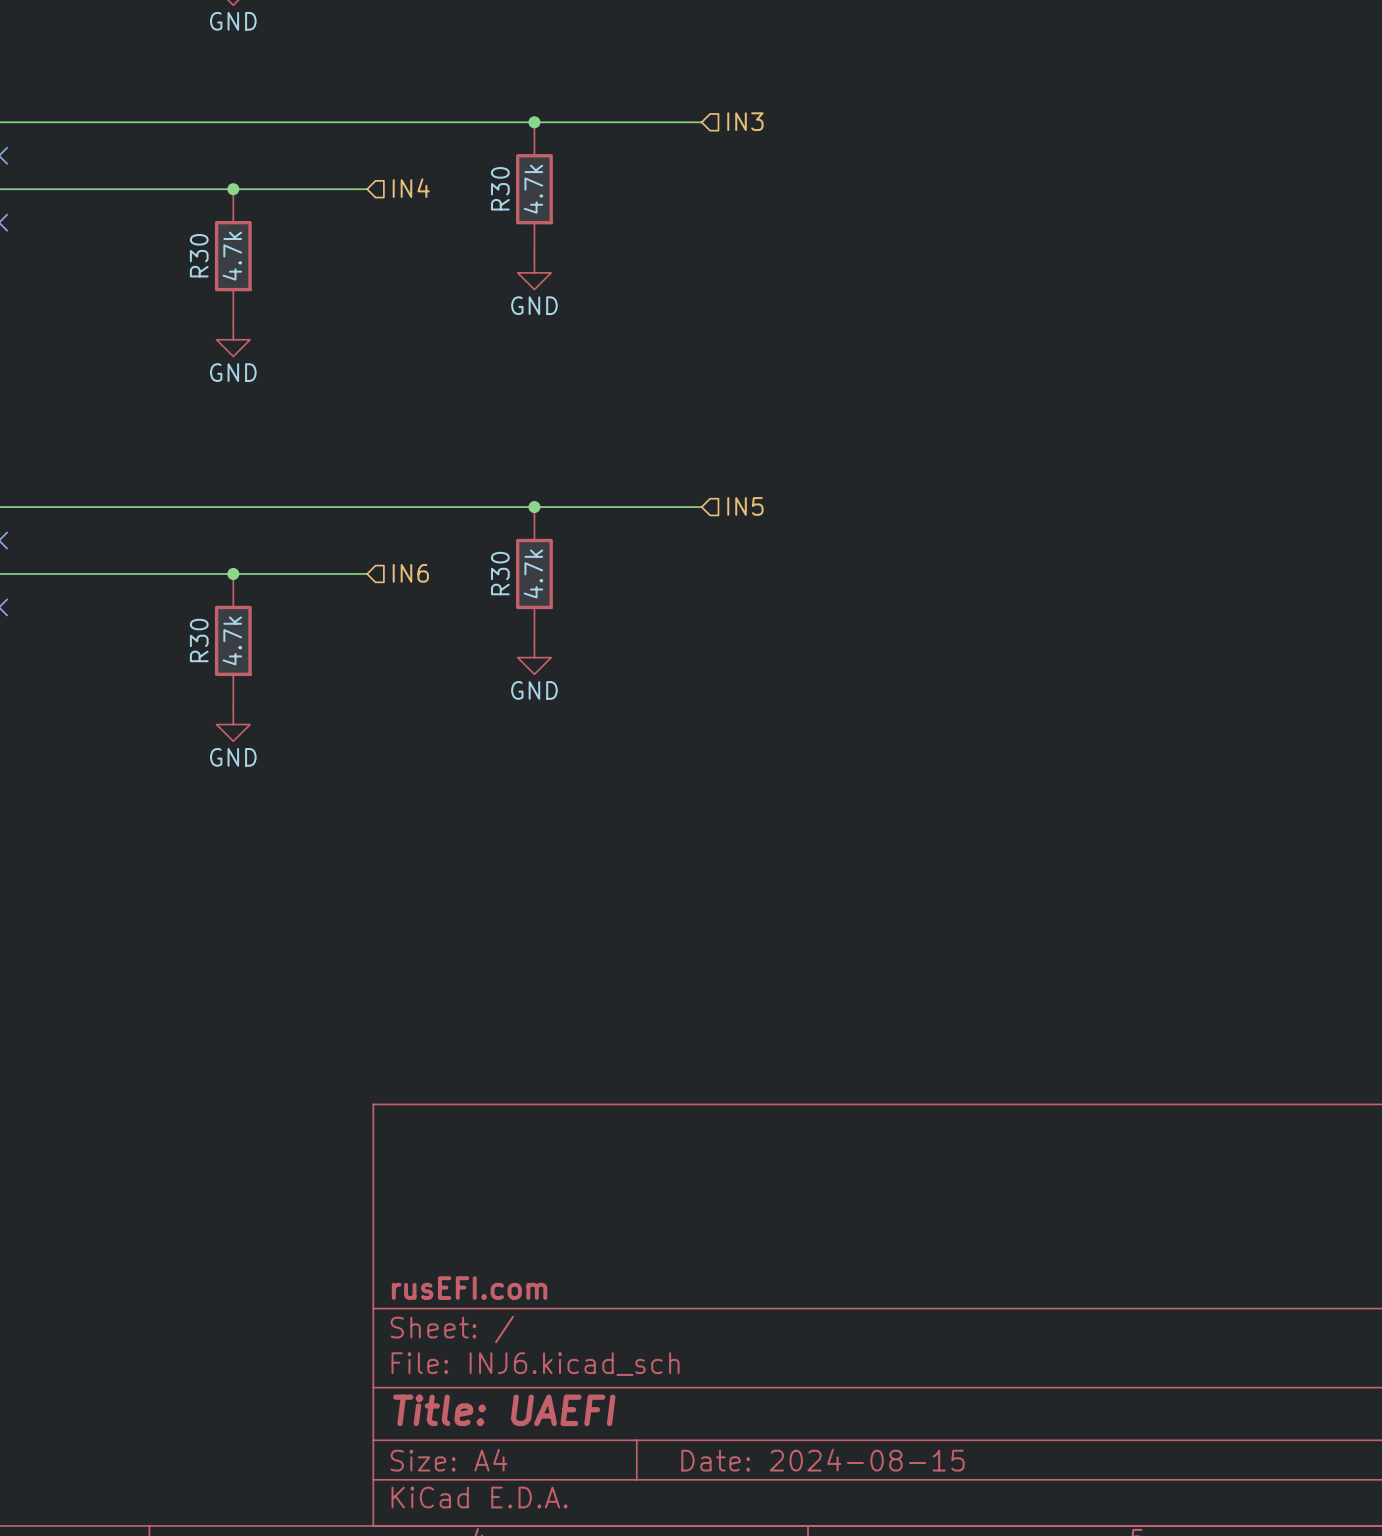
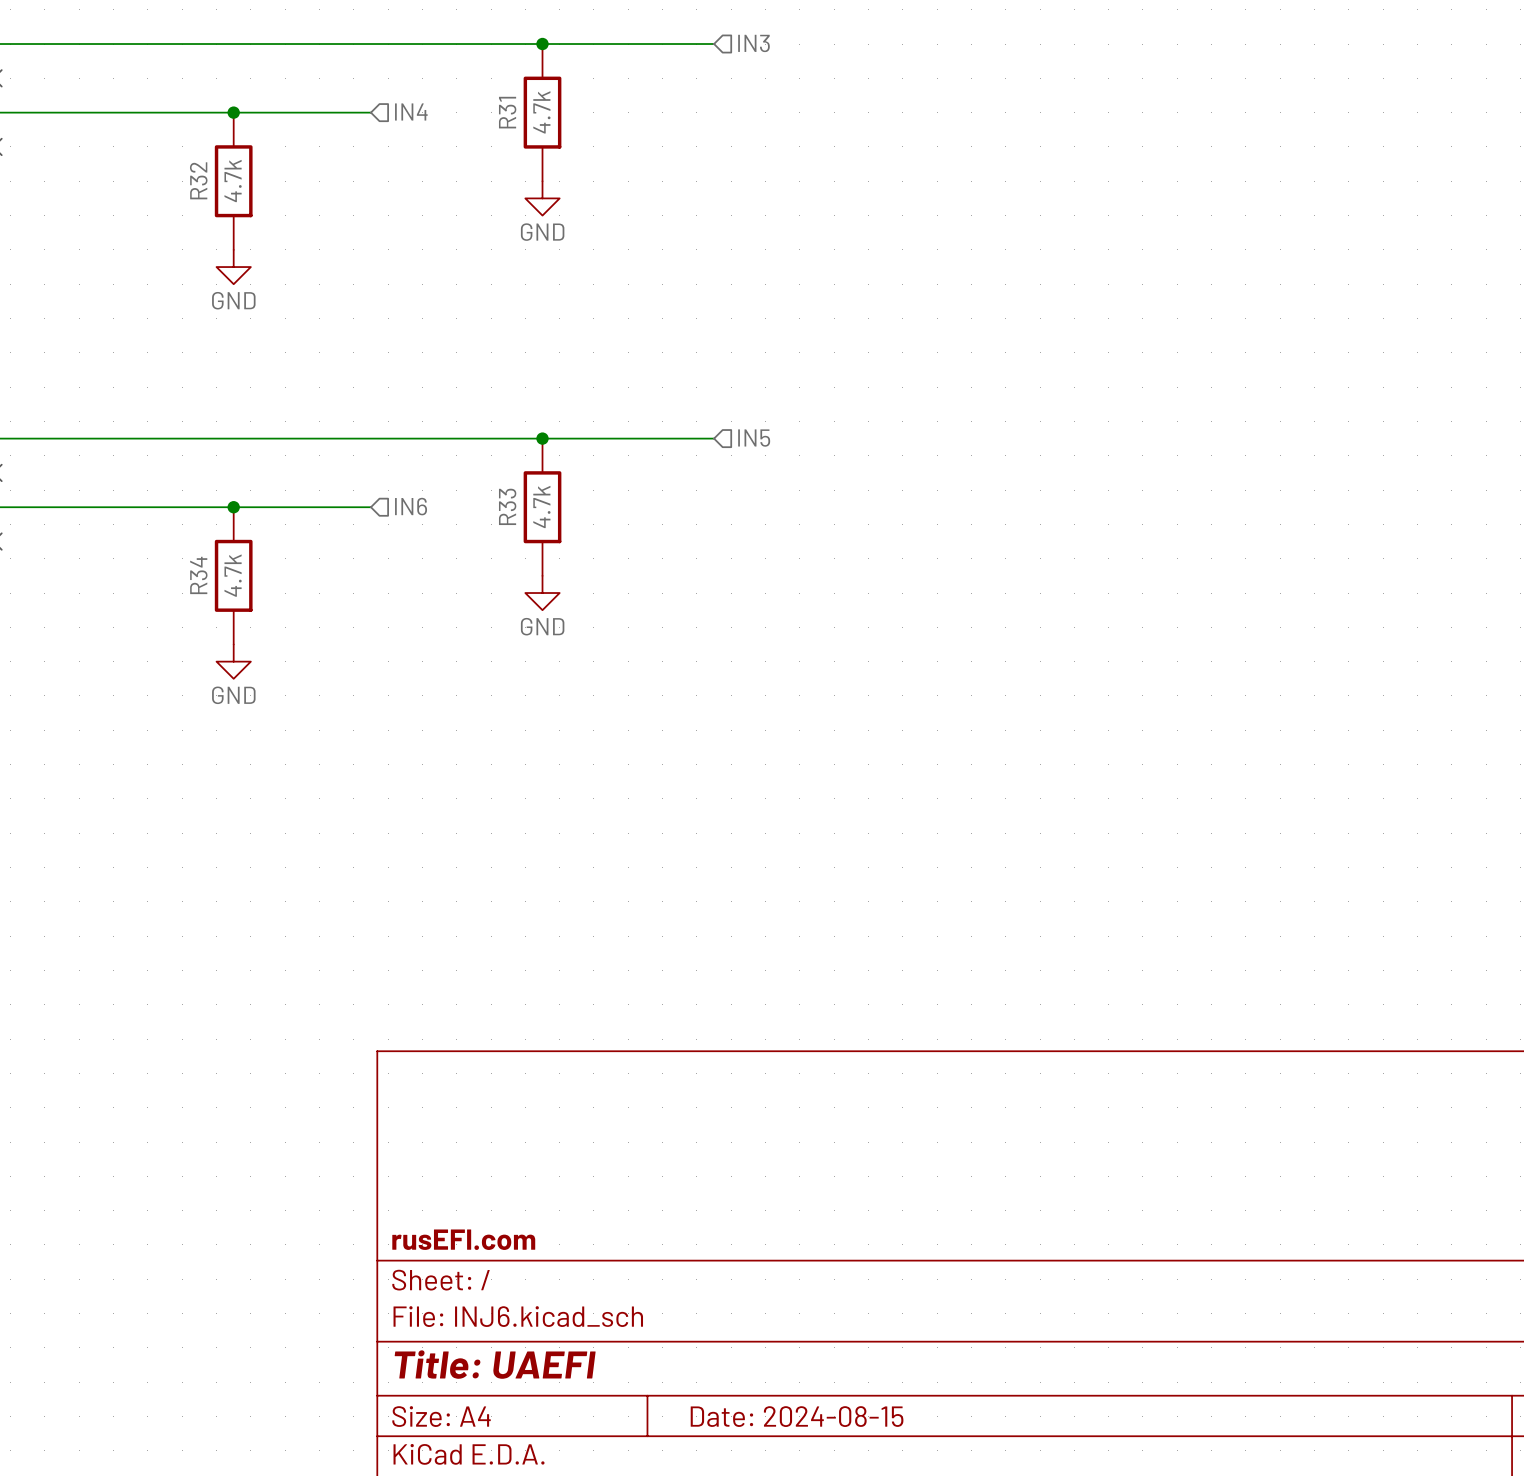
R30 name: R30 (500, 188) -> R31 (507, 112)
R30 name: R30 (199, 255) -> R32 (198, 180)
R30 name: R30 (500, 573) -> R33 (507, 506)
R30 name: R30 (199, 640) -> R34 (198, 575)

